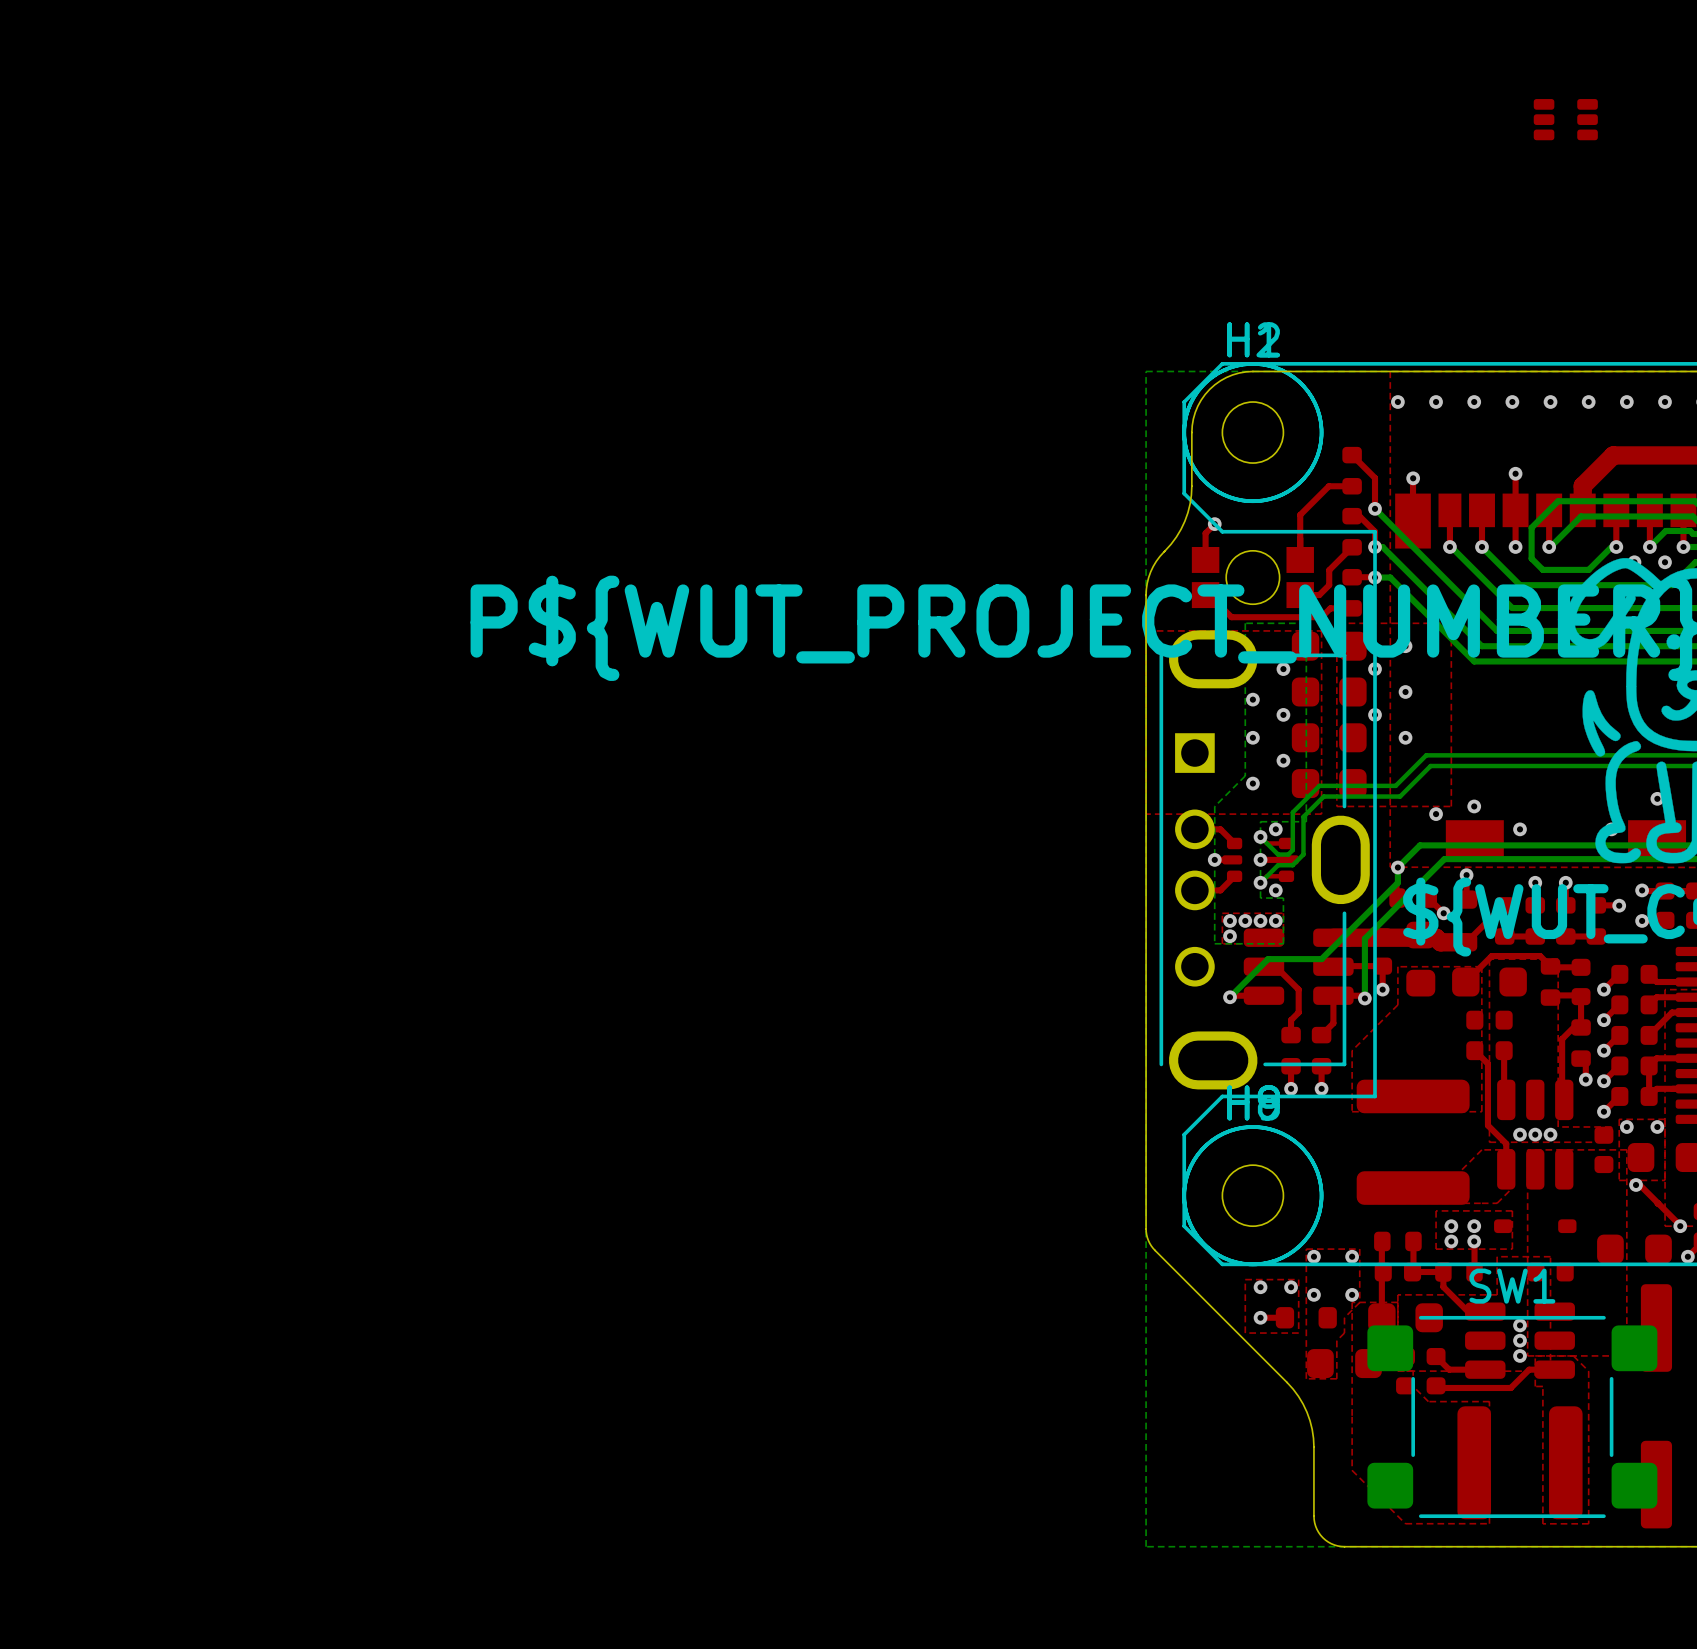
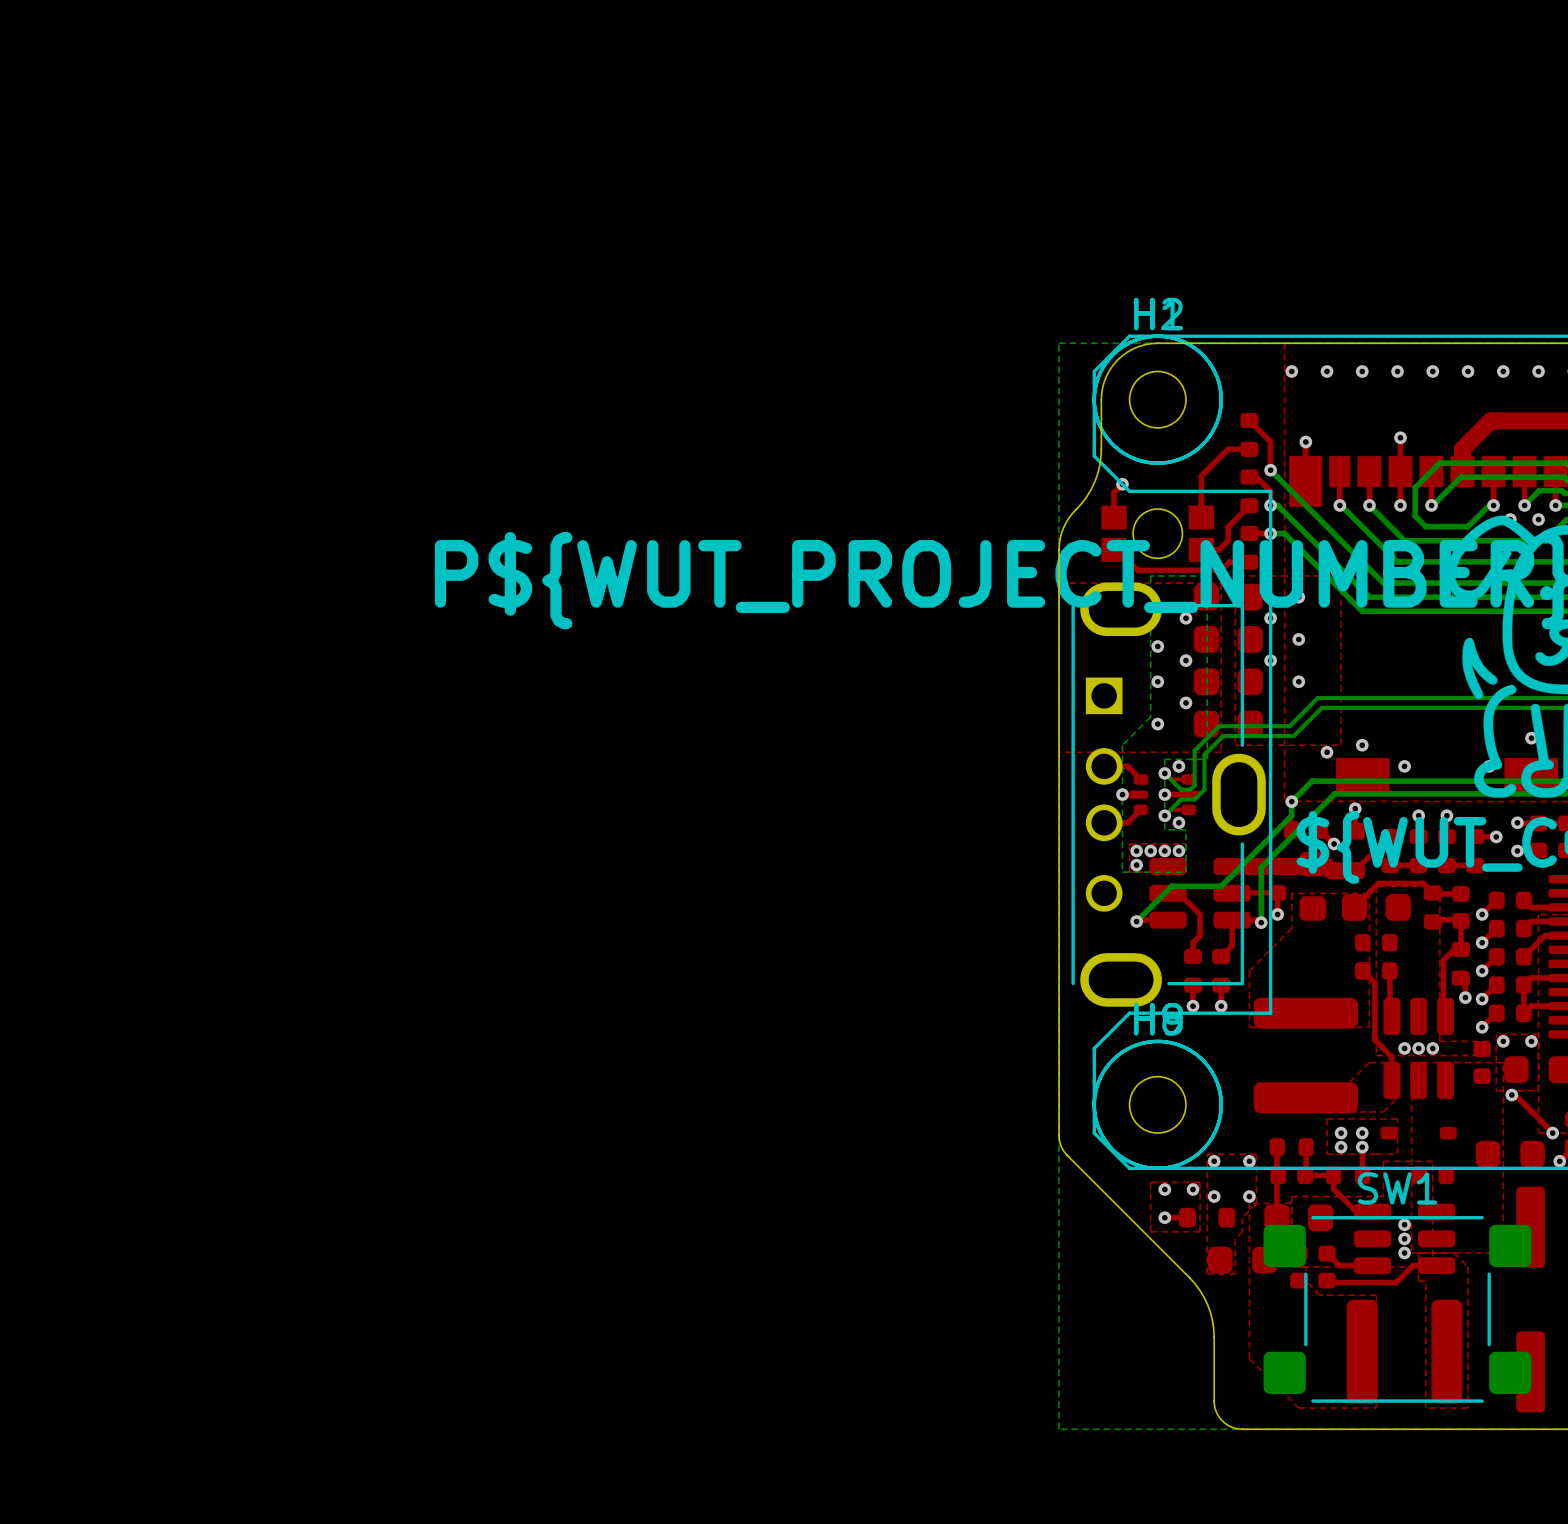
part: (1565, 119) -> none

